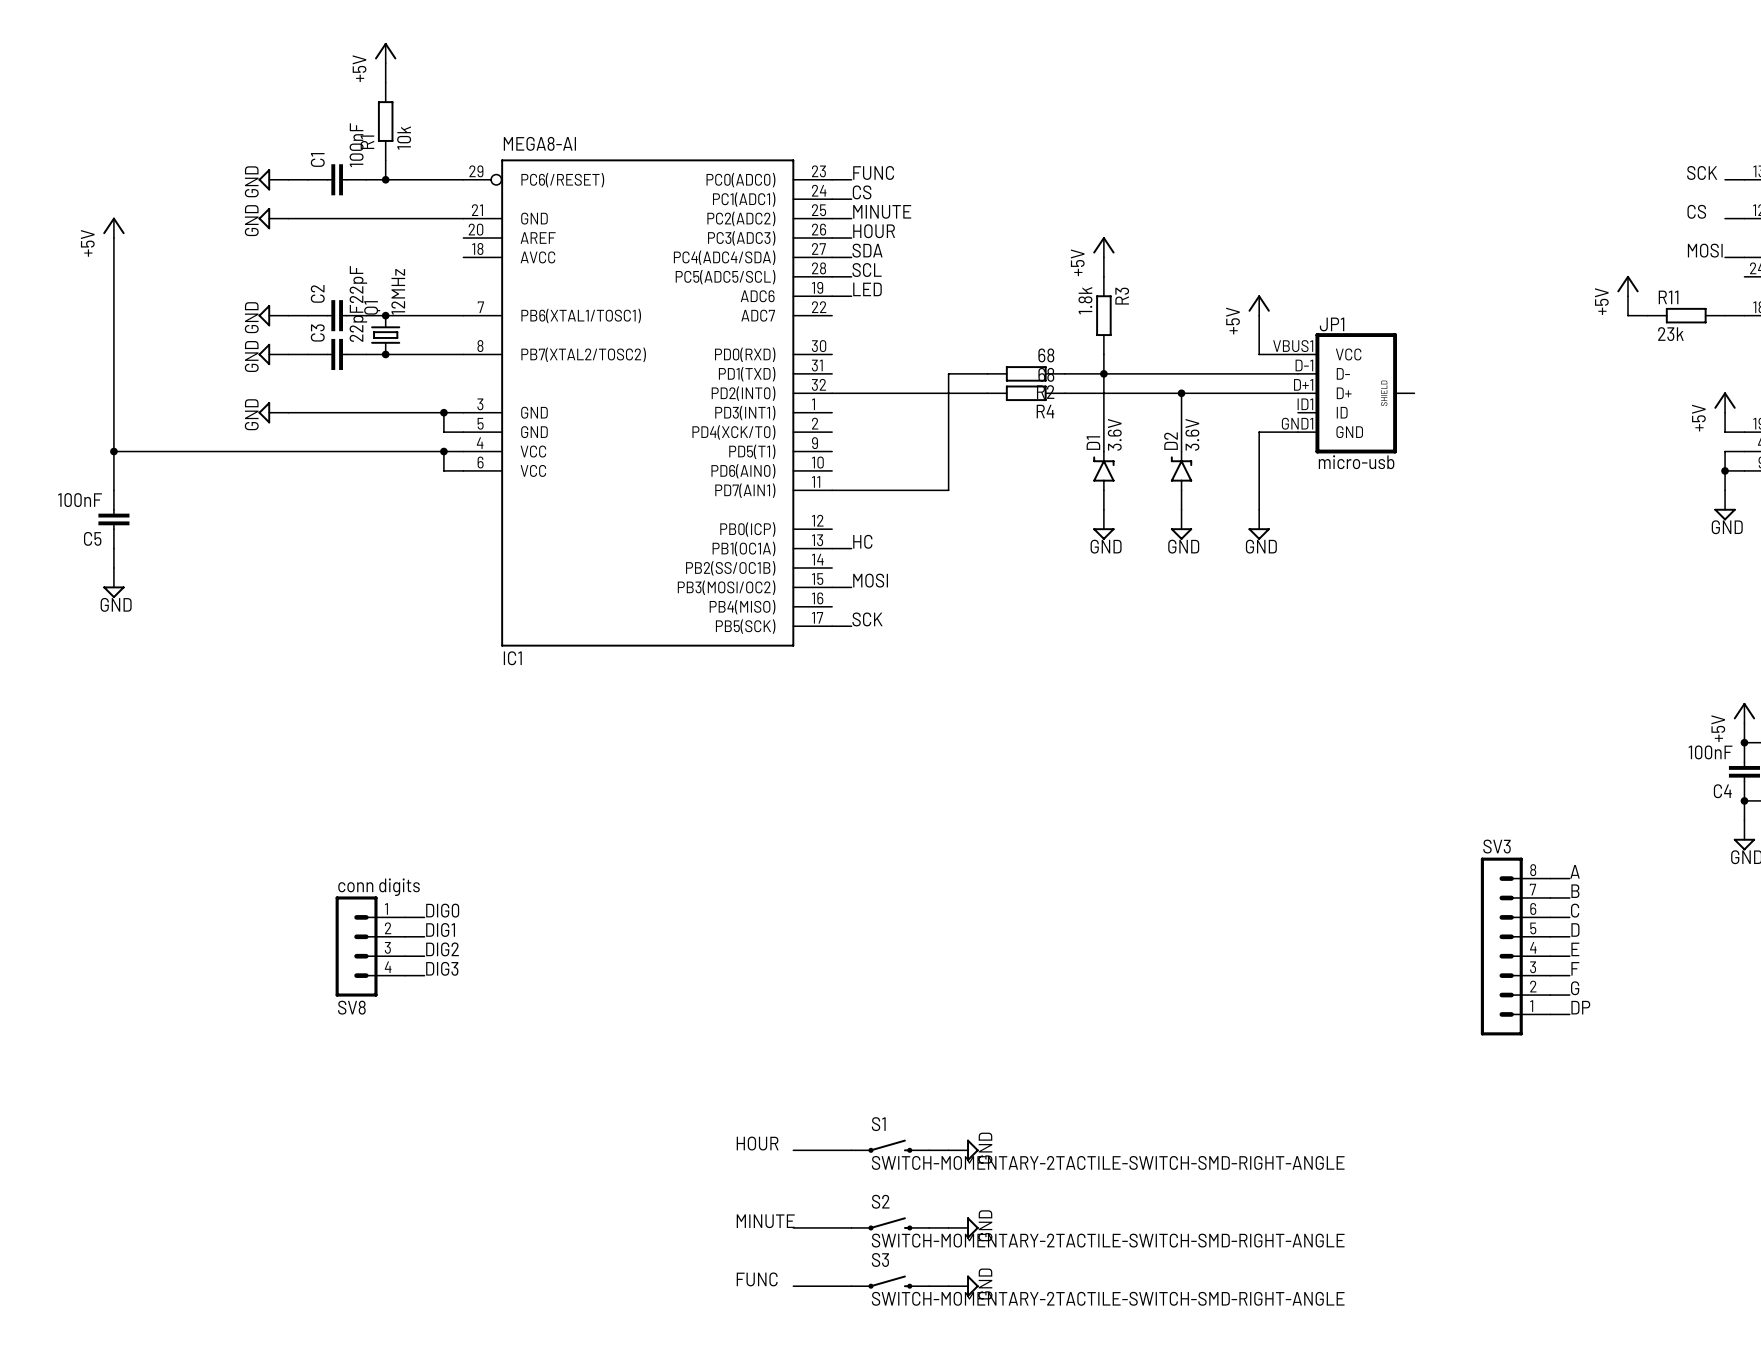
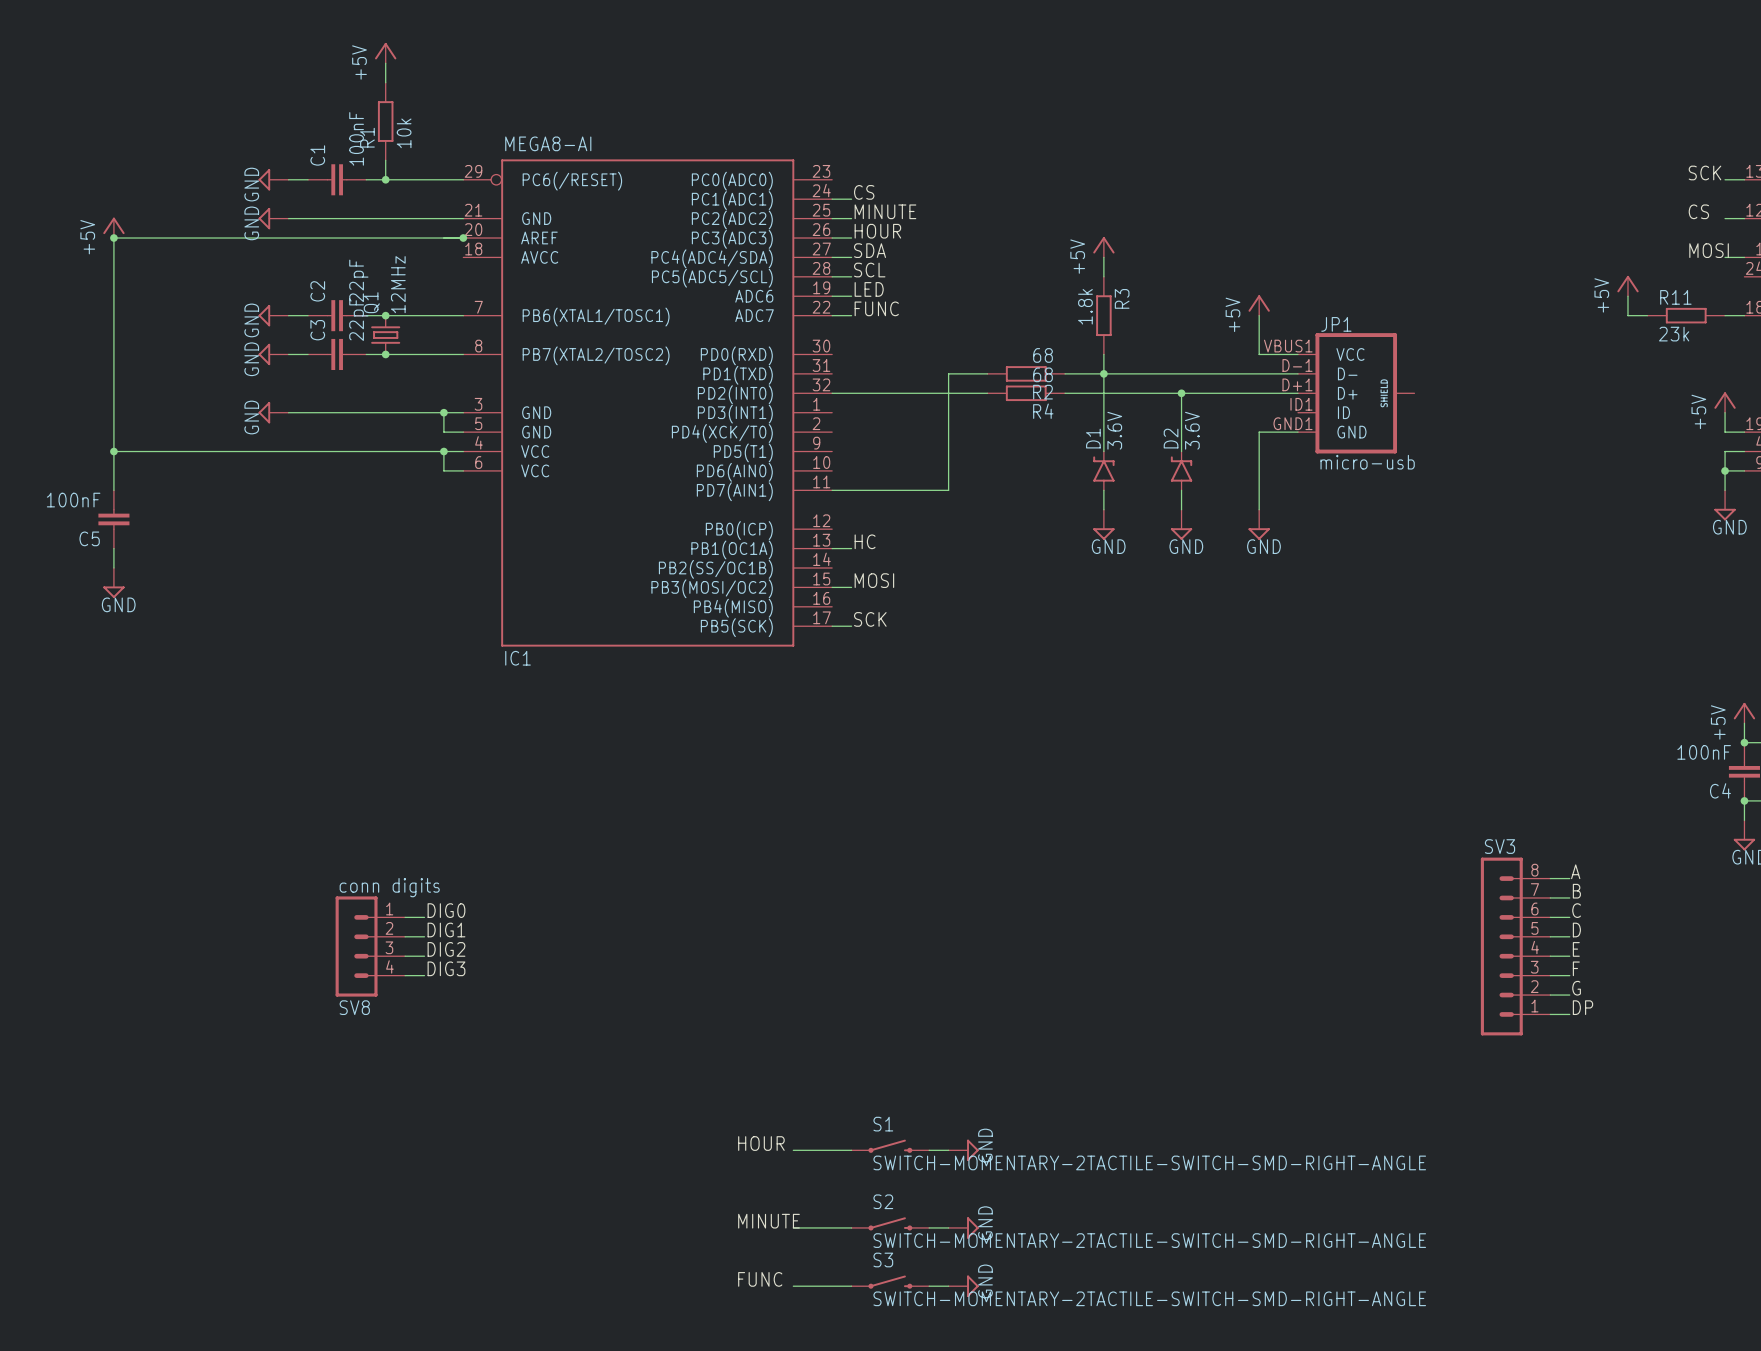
label position: FUNC (873, 172) -> FUNC (876, 308)
wire: (832, 179) (851, 179) -> (832, 315) (851, 315)
wire: none -> (113, 238) (463, 238)
junction: none -> (113, 238)
junction: none -> (463, 238)

